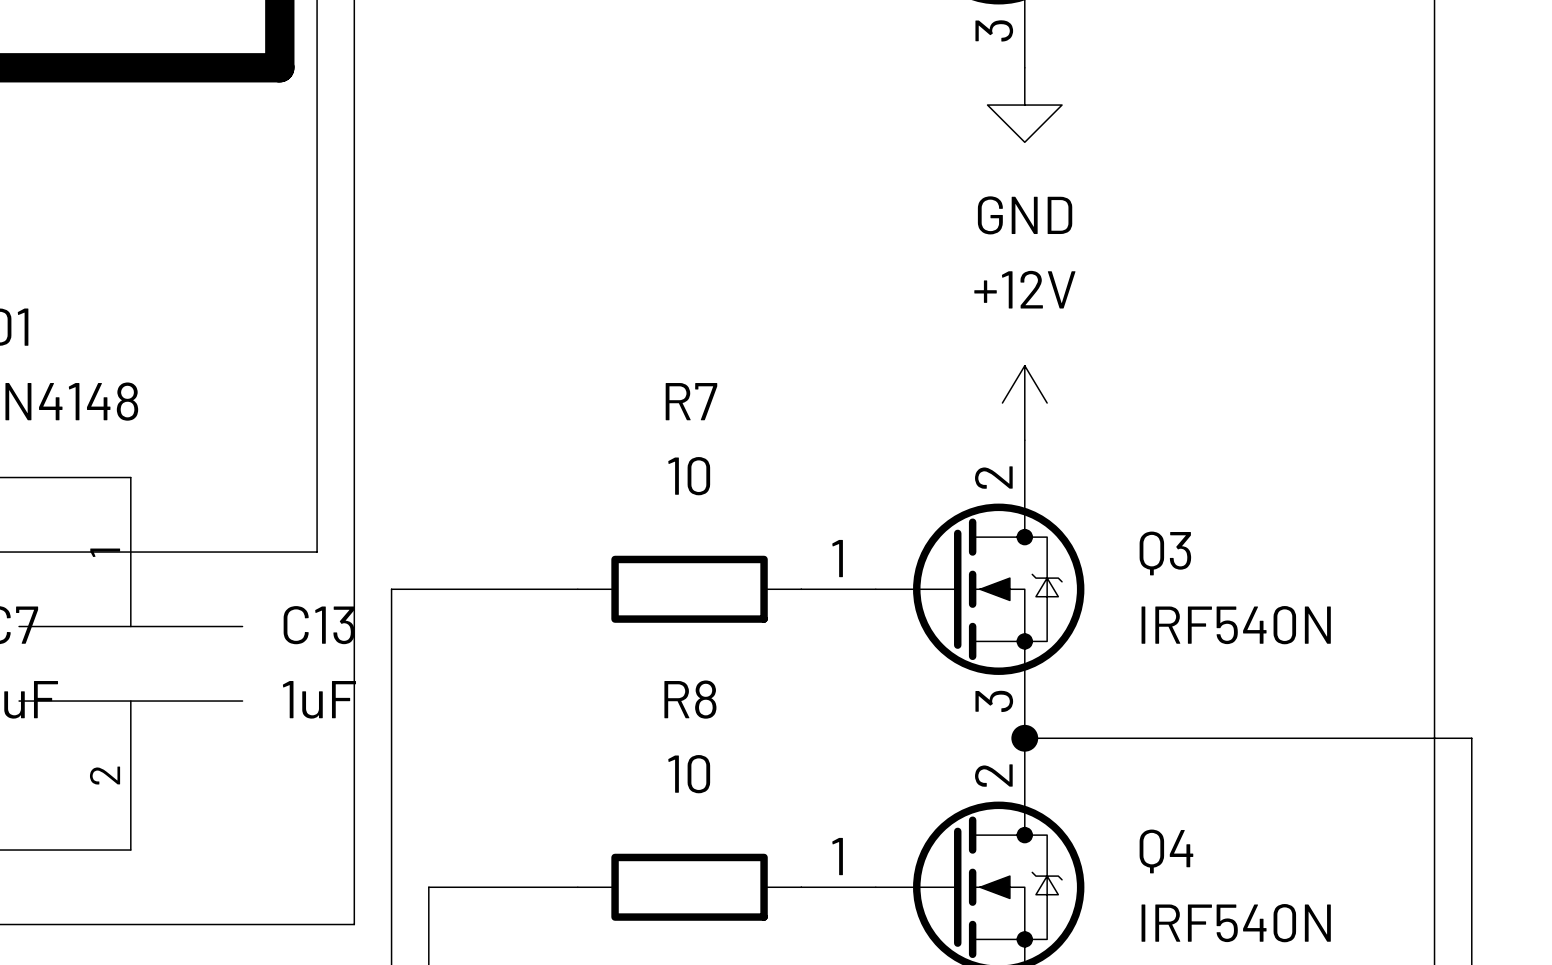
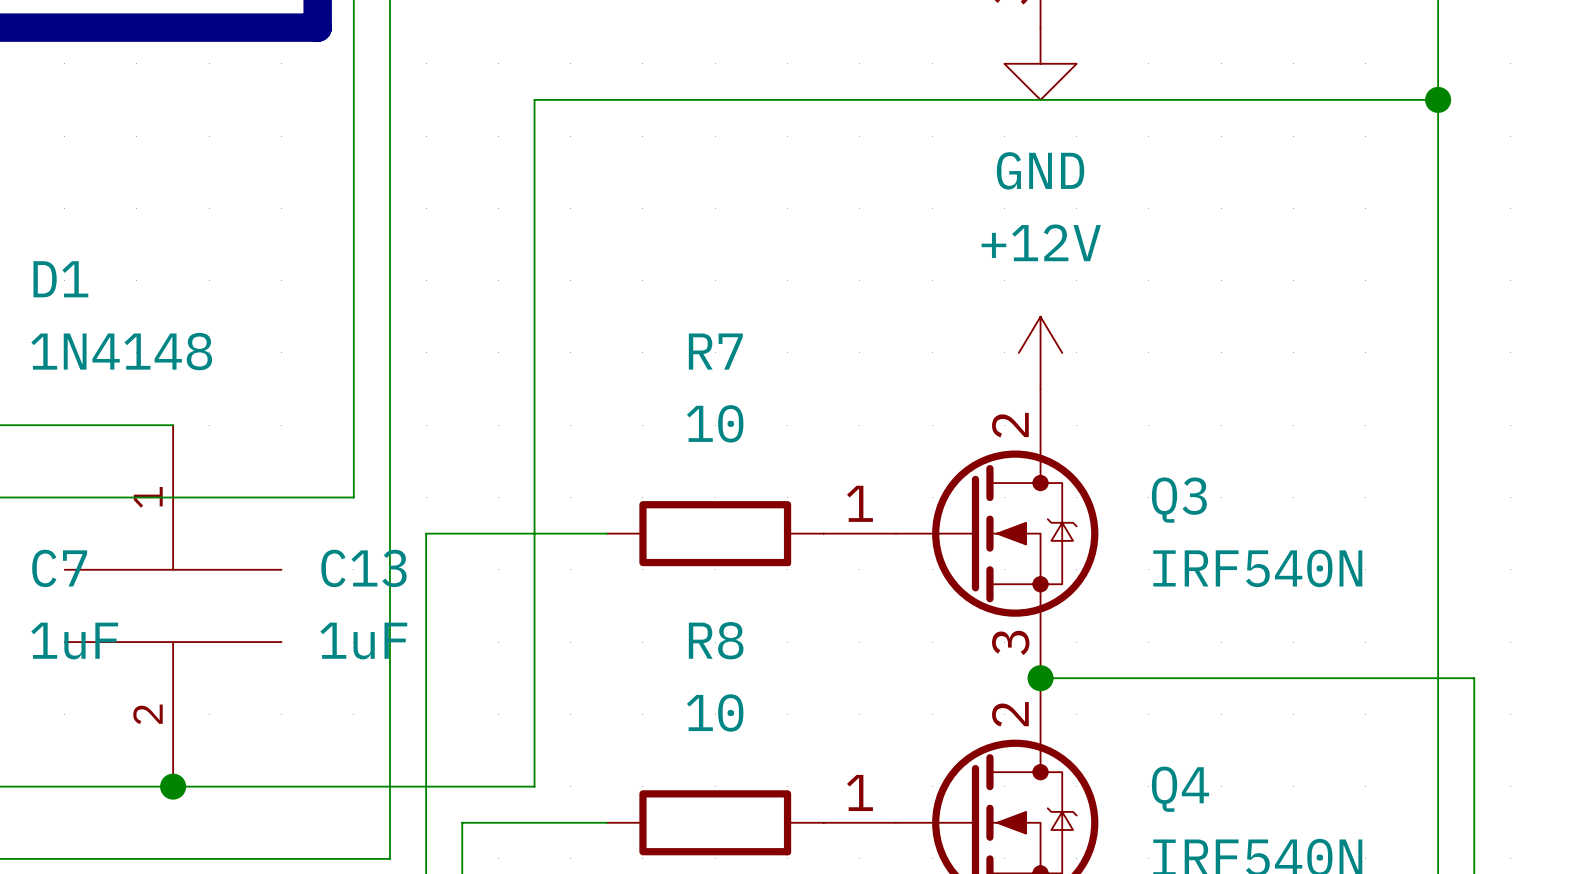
wire: none -> (1438, 99) (534, 99) (534, 786) (173, 786)
junction: none -> (1438, 99)
junction: none -> (173, 786)

